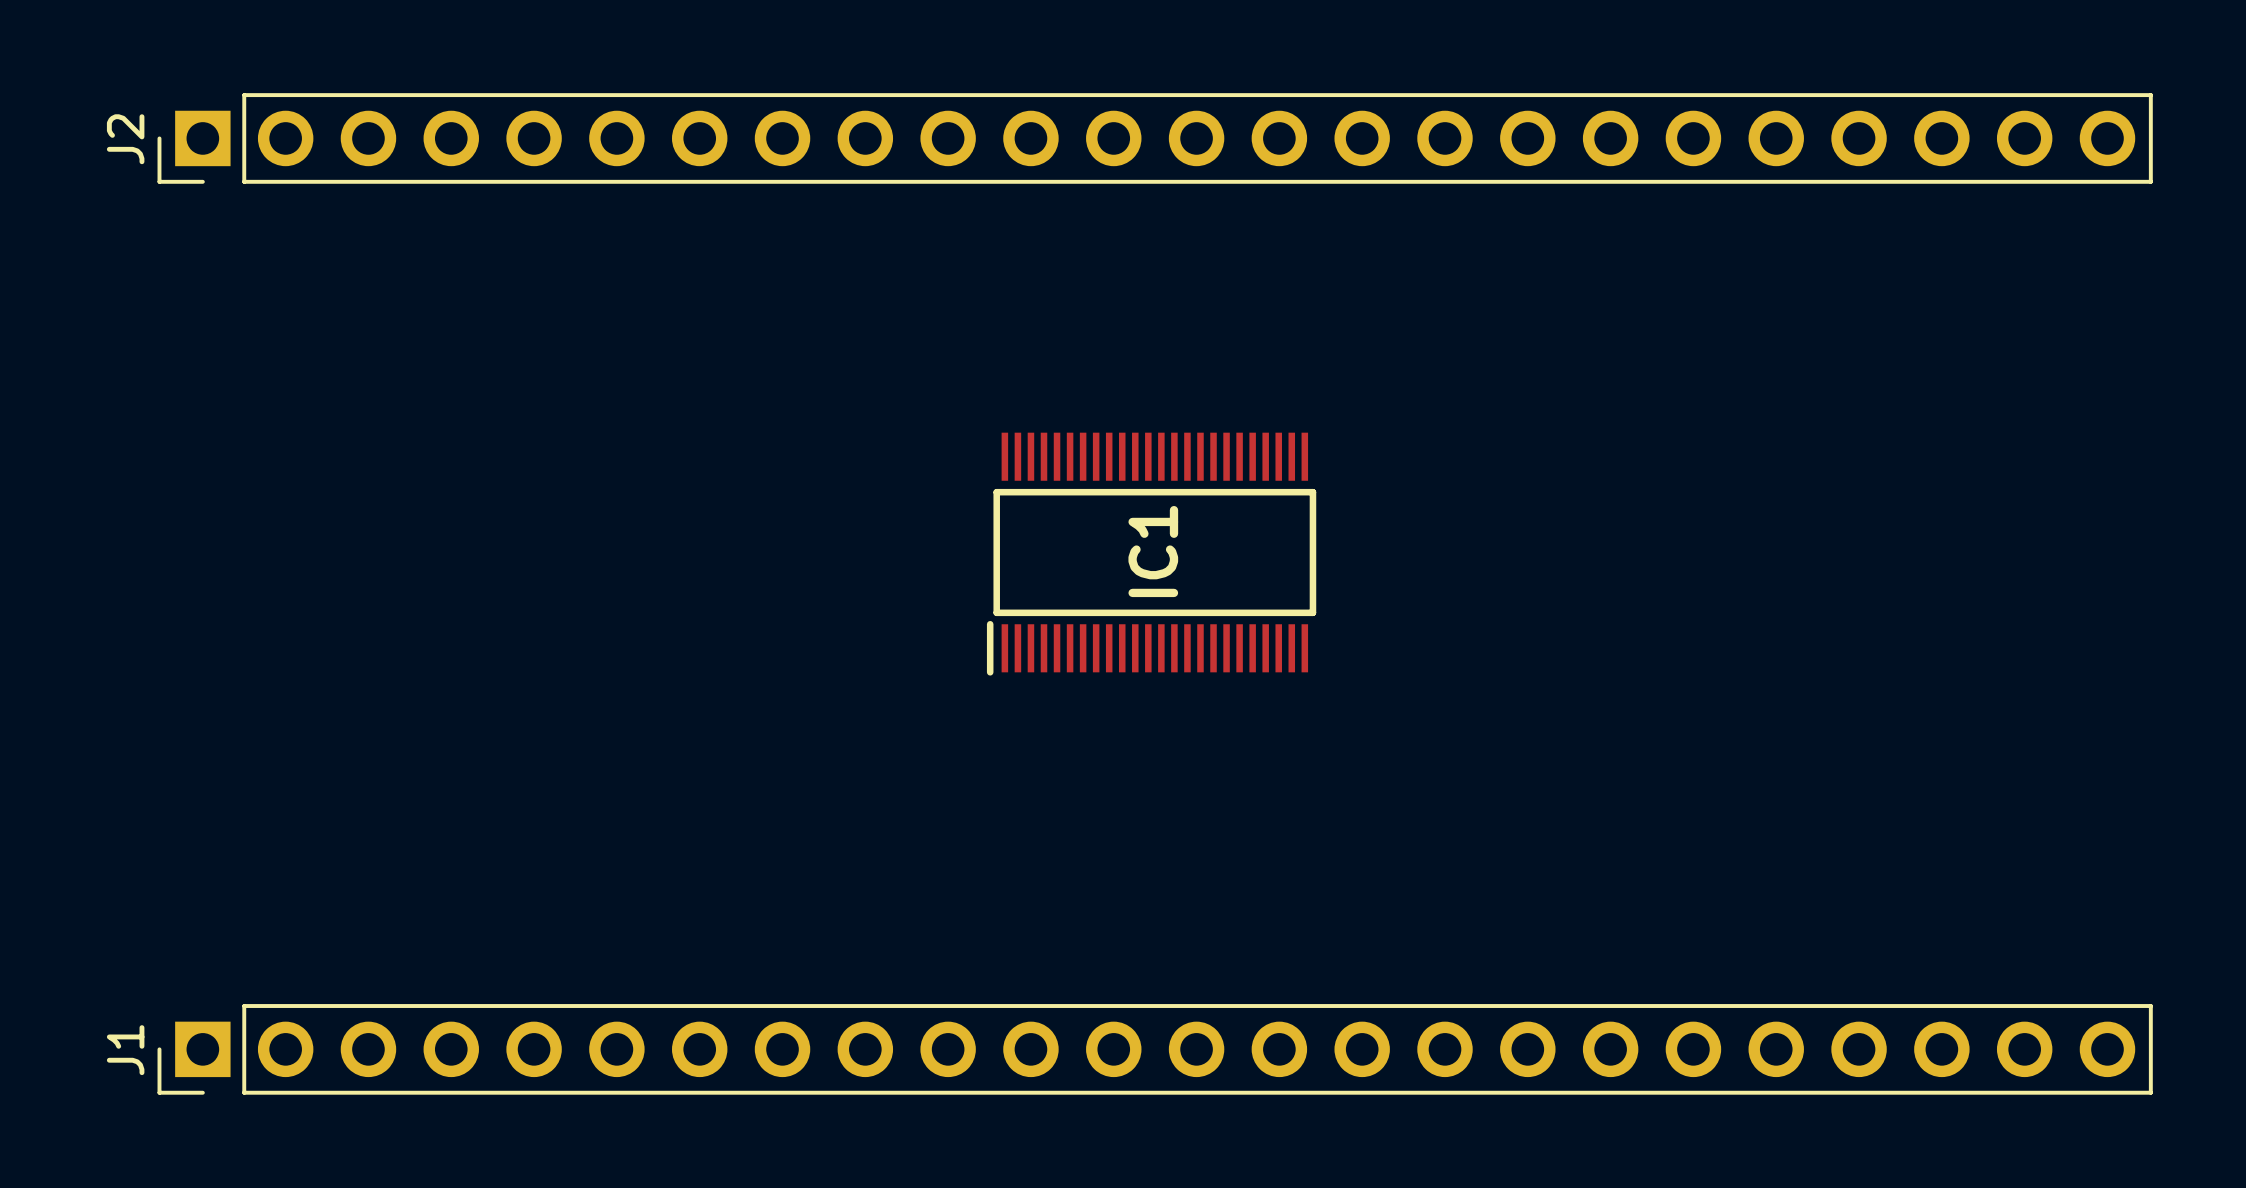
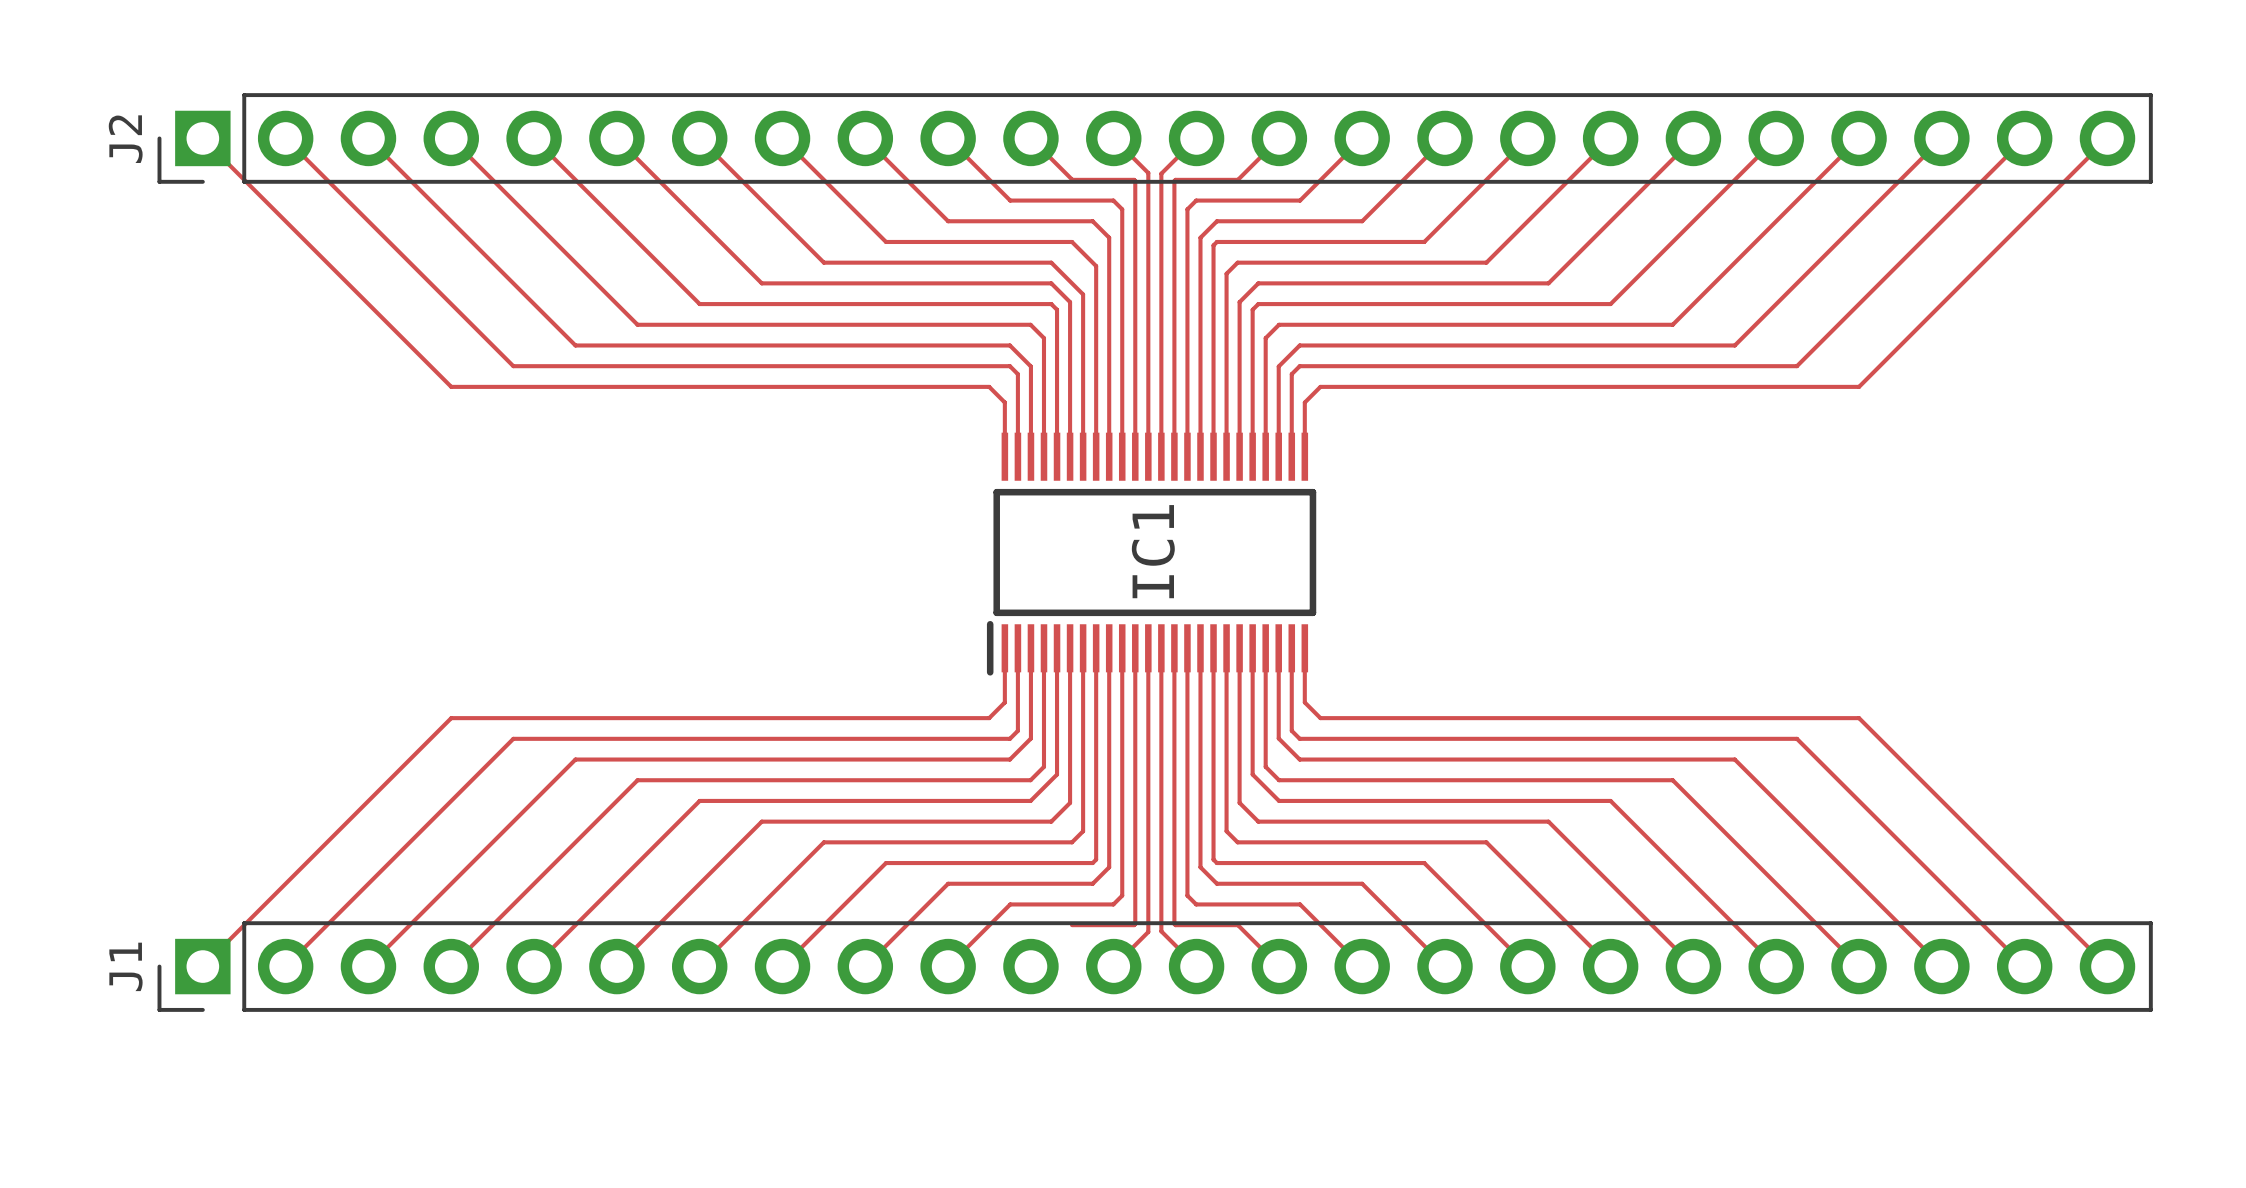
track: none -> (202, 138) (451, 386) (989, 386) (1004, 402) (1004, 456)
track: none -> (285, 138) (513, 366) (1009, 366) (1017, 374) (1017, 456)
track: none -> (368, 138) (575, 345) (1009, 345) (1030, 366) (1030, 456)
track: none -> (451, 138) (637, 324) (1030, 324) (1043, 338) (1043, 456)
track: none -> (534, 138) (699, 304) (1051, 304) (1057, 309) (1057, 456)
track: none -> (616, 138) (761, 283) (1051, 283) (1070, 302) (1070, 456)
track: none -> (699, 138) (823, 262) (1051, 262) (1083, 294) (1083, 456)
track: none -> (782, 138) (886, 241) (1072, 241) (1096, 266) (1096, 456)
track: none -> (865, 138) (948, 221) (1092, 221) (1109, 237) (1109, 456)
track: none -> (948, 138) (1010, 200) (1113, 200) (1122, 209) (1122, 456)
track: none -> (1030, 138) (1072, 179)
track: none -> (1113, 138) (1148, 173) (1148, 456)
track: none -> (1196, 138) (1161, 173) (1161, 456)
track: none -> (1279, 138) (1237, 179) (1174, 181) (1174, 456)
track: none -> (1362, 138) (1300, 200) (1196, 200) (1187, 209) (1187, 456)
track: none -> (1445, 138) (1362, 221) (1216, 221) (1200, 237) (1200, 456)
track: none -> (1527, 138) (1424, 241) (1216, 241) (1213, 245) (1213, 456)
track: none -> (1610, 138) (1486, 262) (1237, 262) (1226, 273) (1226, 456)
track: none -> (1693, 138) (1548, 283) (1258, 283) (1239, 302) (1239, 456)
track: none -> (1776, 138) (1610, 304) (1258, 304) (1252, 309) (1252, 456)
track: none -> (1859, 138) (1672, 324) (1279, 324) (1265, 338) (1265, 456)
track: none -> (1941, 138) (1734, 345) (1299, 345) (1278, 366) (1278, 456)
track: none -> (2024, 138) (1796, 366) (1299, 366) (1291, 374) (1291, 456)
track: none -> (2107, 138) (1859, 386) (1320, 386) (1304, 402) (1304, 456)
track: none -> (1072, 179) (1135, 181) (1135, 456)
track: none -> (1004, 648) (1004, 702) (989, 718) (451, 718) (202, 966)
track: none -> (1017, 648) (1017, 730) (1009, 738) (513, 738) (285, 966)
track: none -> (1030, 648) (1030, 738) (1009, 759) (575, 759) (368, 966)
track: none -> (1043, 648) (1043, 766) (1030, 780) (637, 780) (451, 966)
track: none -> (1057, 648) (1057, 774) (1030, 800) (699, 800) (534, 966)
track: none -> (1070, 648) (1070, 802) (1051, 821) (761, 821) (616, 966)
track: none -> (1083, 648) (1083, 831) (1072, 842) (823, 842) (699, 966)
track: none -> (1096, 648) (1096, 859) (1092, 863) (886, 863) (782, 966)
track: none -> (1109, 648) (1109, 867) (1092, 883) (948, 883) (865, 966)
track: none -> (1122, 648) (1122, 895) (1113, 904) (1010, 904) (948, 966)
track: none -> (1135, 648) (1135, 924) (1072, 925)
track: none -> (1148, 648) (1148, 932) (1113, 966)
track: none -> (1161, 648) (1161, 931) (1196, 966)
track: none -> (1174, 648) (1174, 924) (1237, 925) (1279, 966)
track: none -> (1187, 648) (1187, 895) (1196, 904) (1300, 904) (1362, 966)
track: none -> (1200, 648) (1200, 867) (1216, 883) (1362, 883) (1445, 966)
track: none -> (1213, 648) (1213, 859) (1216, 863) (1424, 863) (1527, 966)
track: none -> (1226, 648) (1226, 831) (1237, 842) (1486, 842) (1610, 966)
track: none -> (1239, 648) (1239, 802) (1258, 821) (1548, 821) (1693, 966)
track: none -> (1252, 648) (1252, 774) (1279, 800) (1610, 800) (1776, 966)
track: none -> (1265, 648) (1265, 766) (1279, 780) (1672, 780) (1859, 966)
track: none -> (1278, 648) (1278, 738) (1299, 759) (1734, 759) (1941, 966)
track: none -> (1291, 648) (1291, 730) (1299, 738) (1796, 738) (2024, 966)
track: none -> (1304, 648) (1304, 702) (1320, 718) (1859, 718) (2107, 966)
J1 position: (1155, 1049) -> (1155, 966)

